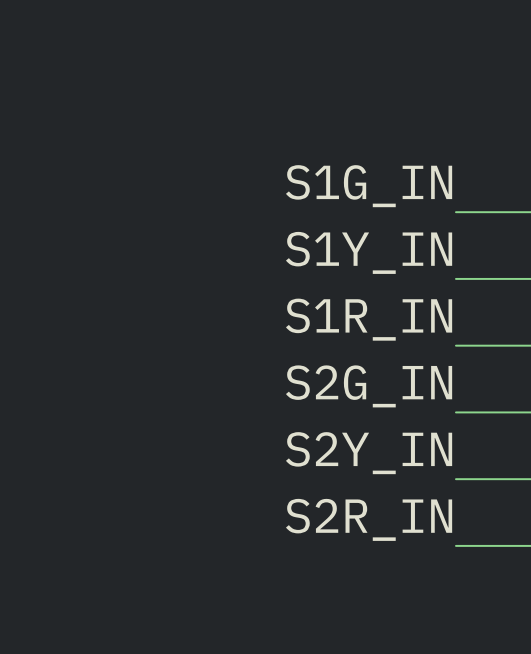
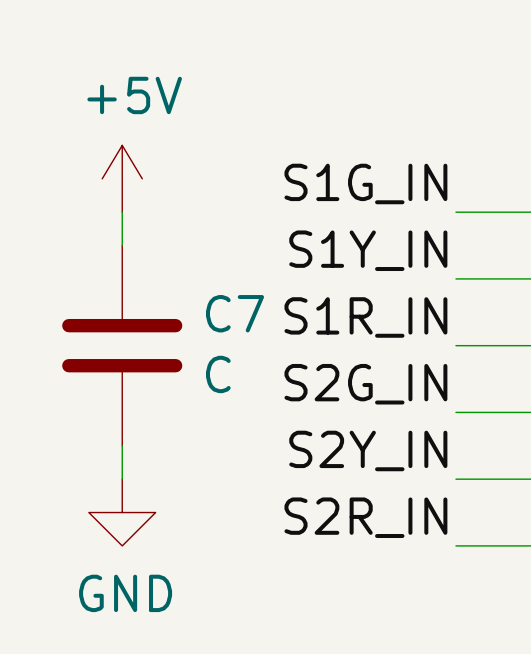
power symbol: none -> +5V (122, 178)
wire: none -> (122, 212) (122, 245)
C7: none -> C (122, 345)
wire: none -> (122, 445) (122, 479)
power symbol: none -> GND (122, 512)

